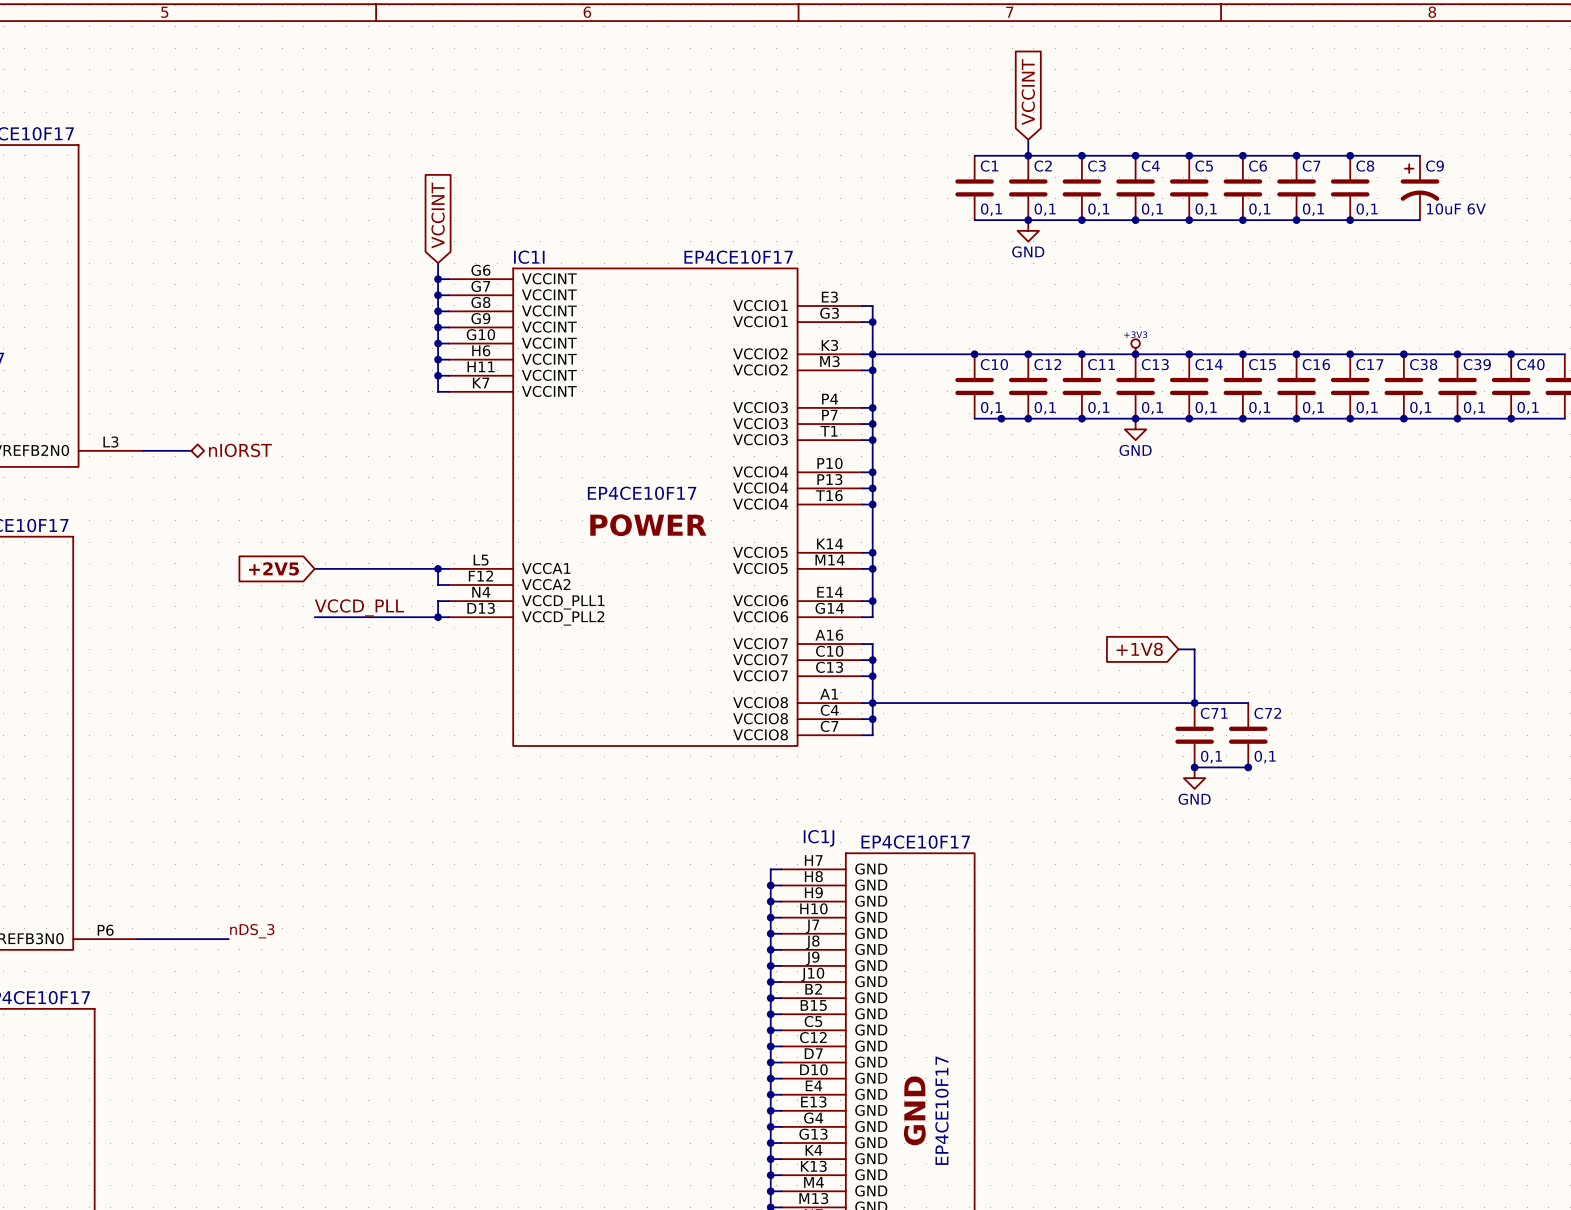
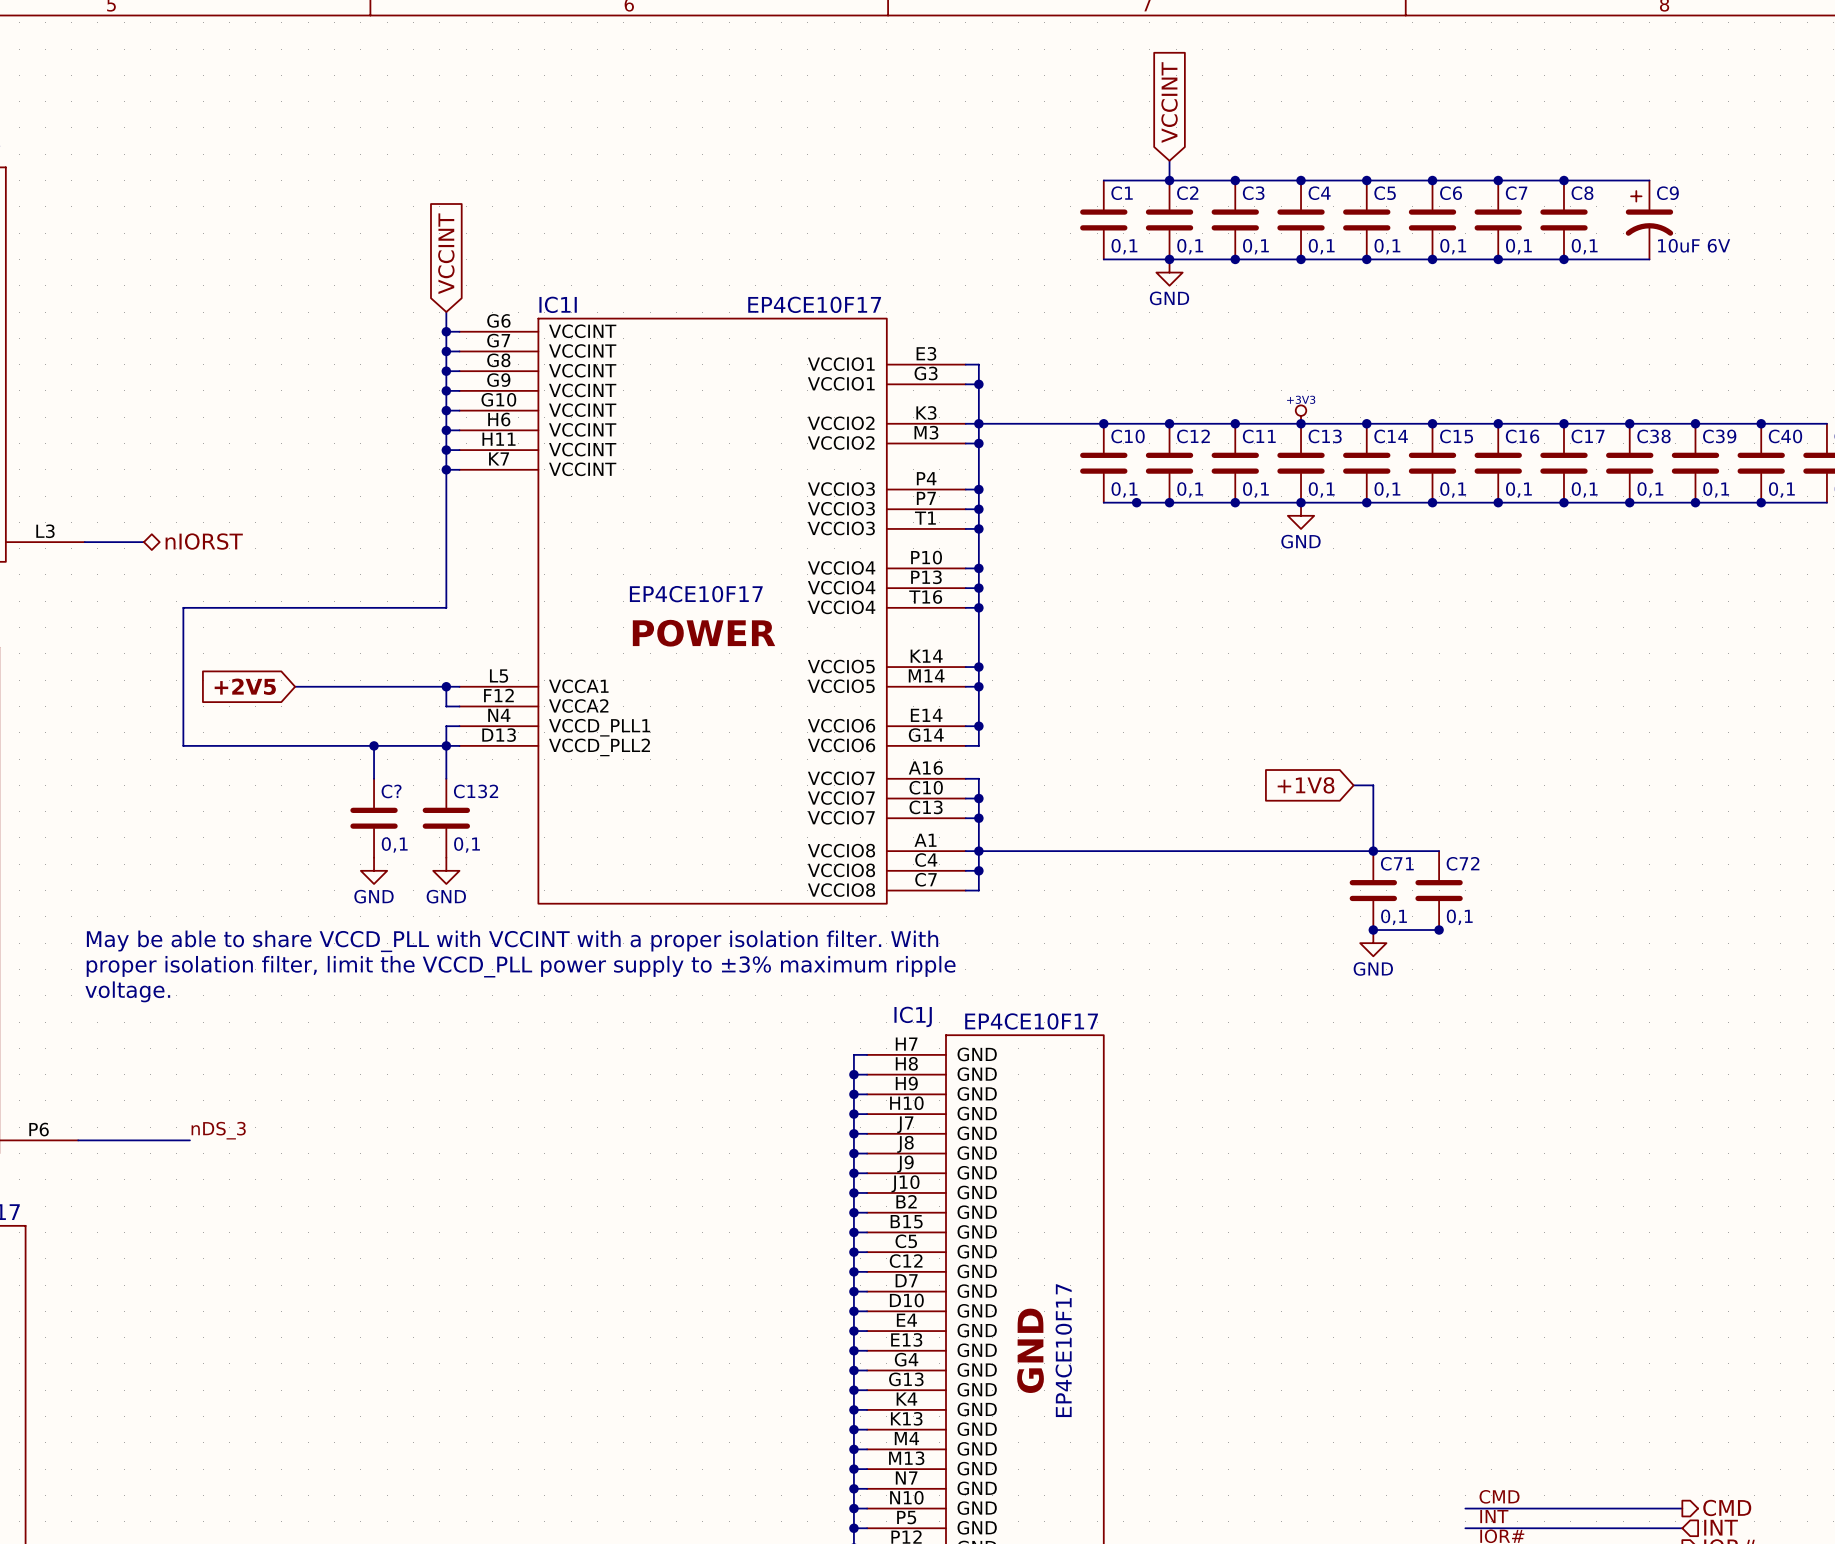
wire: none -> (446, 469) (446, 607) (183, 607) (183, 745) (295, 745)
junction: none -> (446, 469)
label: VCCD_PLL (359, 607) -> none
wire: none -> (374, 745) (374, 778)
junction: none -> (374, 745)
wire: none -> (446, 745) (446, 778)
C?: none -> 0,1 (374, 818)
C132: none -> 0,1 (446, 818)
power symbol: none -> GND (374, 870)
power symbol: none -> GND (446, 870)
text: none -> May be able to share VCCD_PLL with VCCINT with a proper isolation filter. With (512, 941)
text: none -> proper isolation filter, limit the VCCD_PLL power supply to ±3% maximum ripple (521, 966)
text: none -> voltage. (127, 991)

